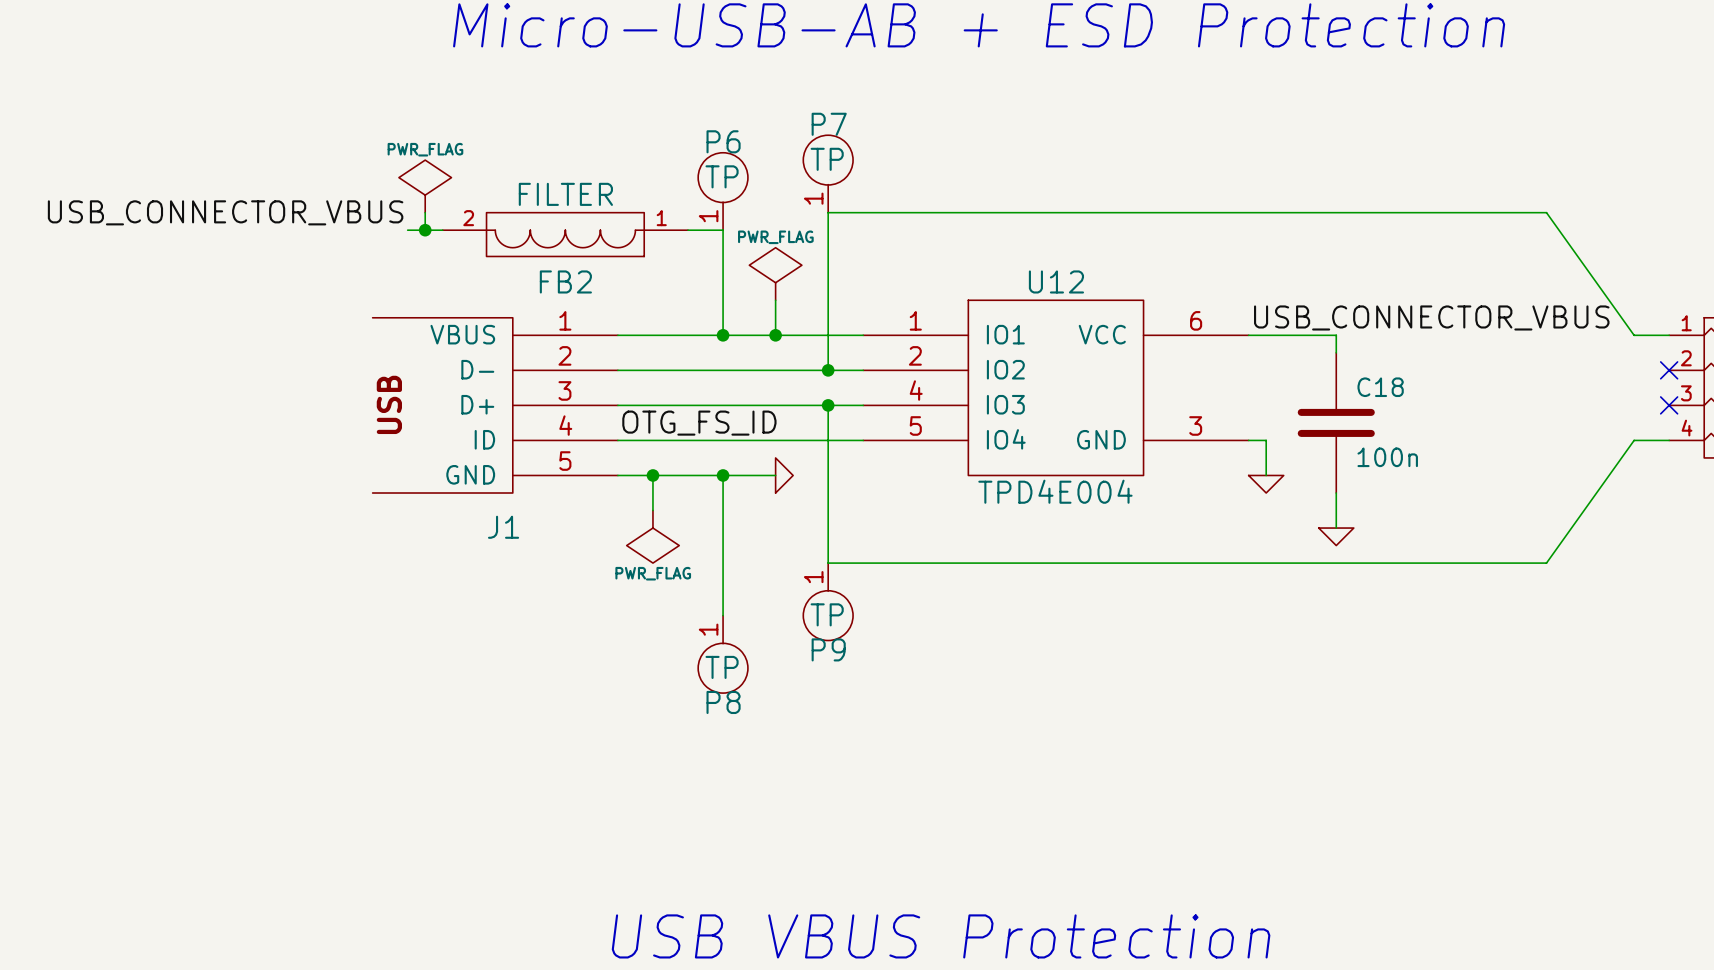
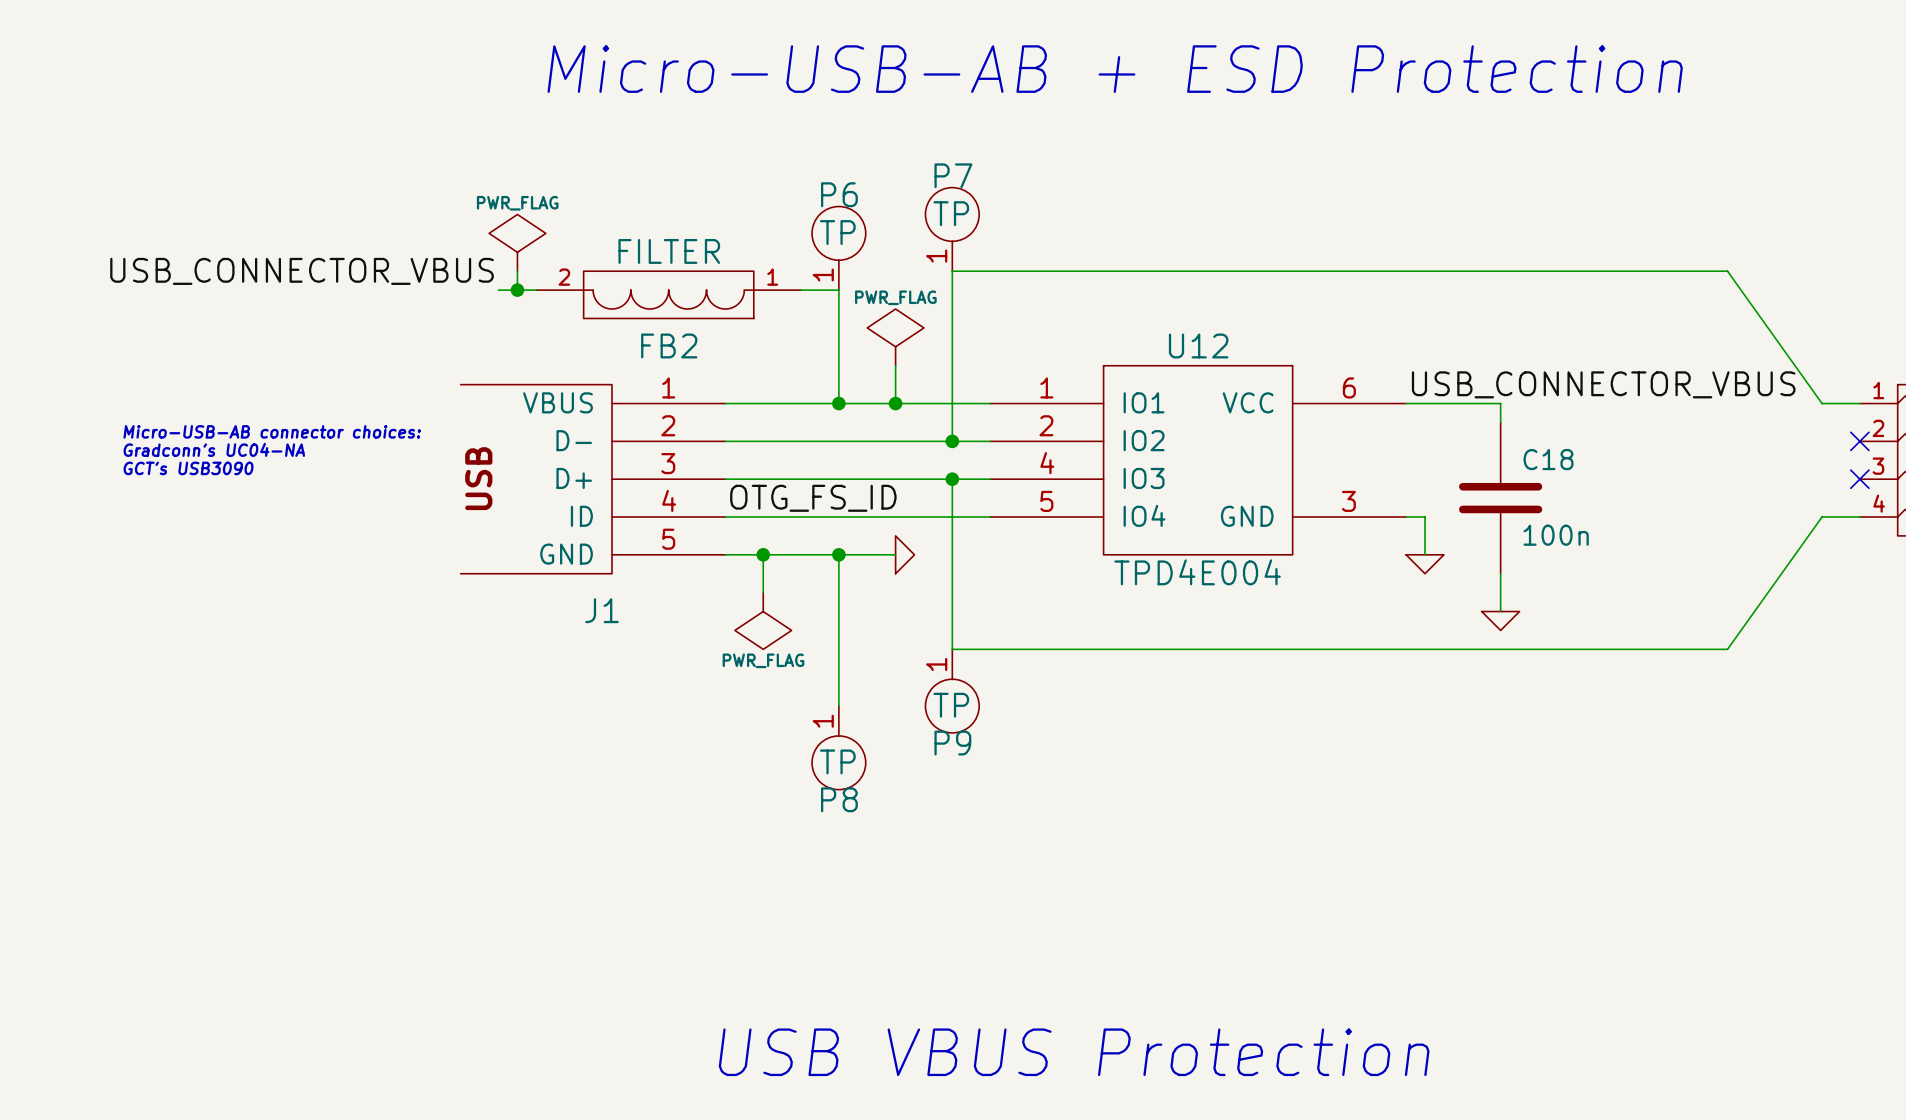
text: none -> Micro-USB-AB connector choices: (272, 431)
text: none -> Gradconn's UC04-NA (214, 449)
text: none -> GCT's USB3090 (188, 468)

